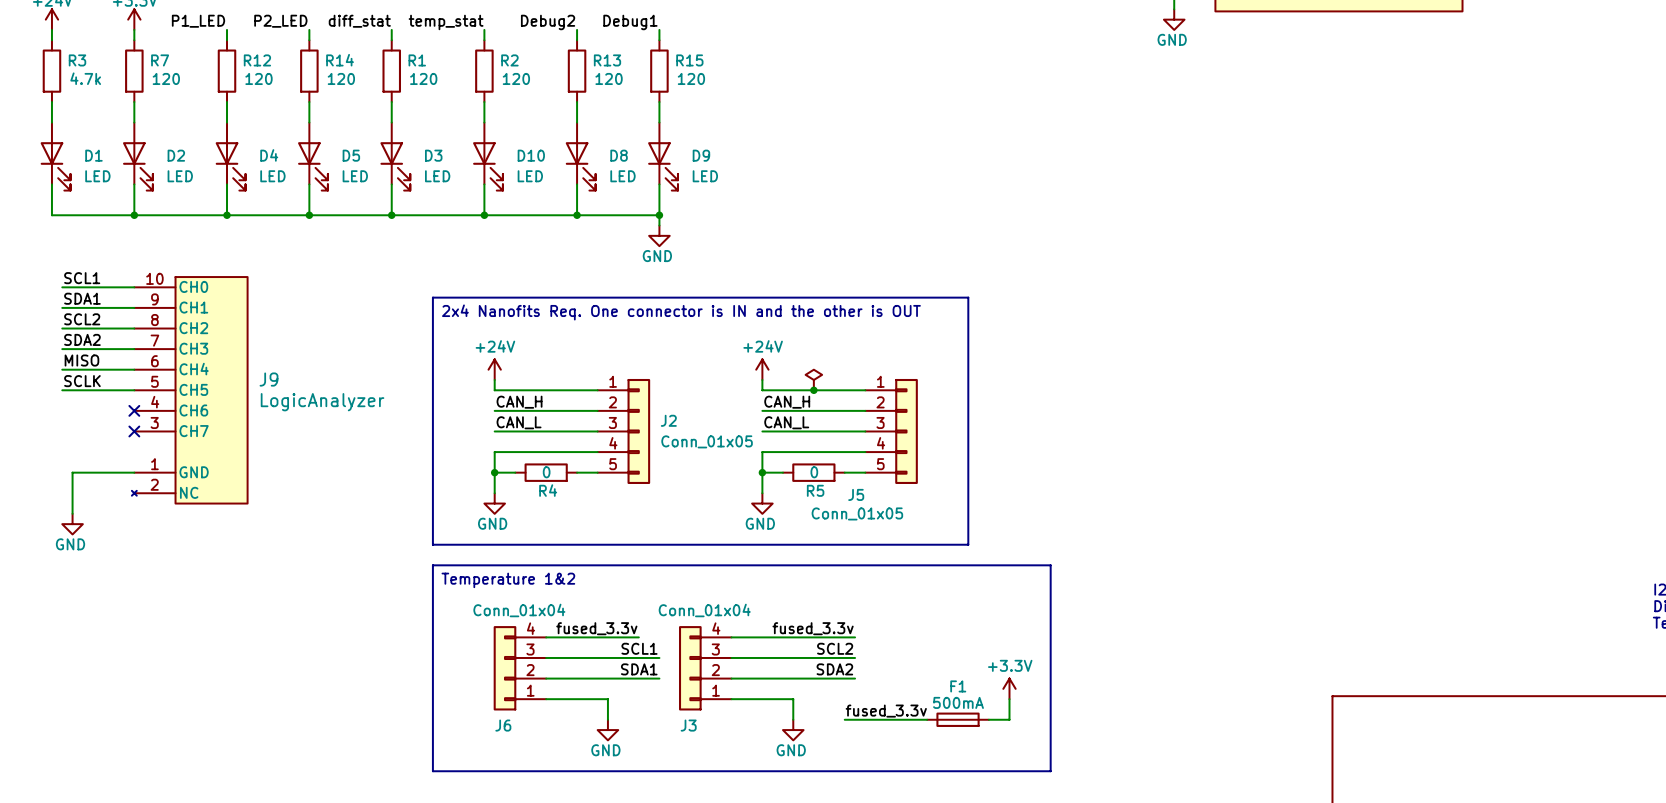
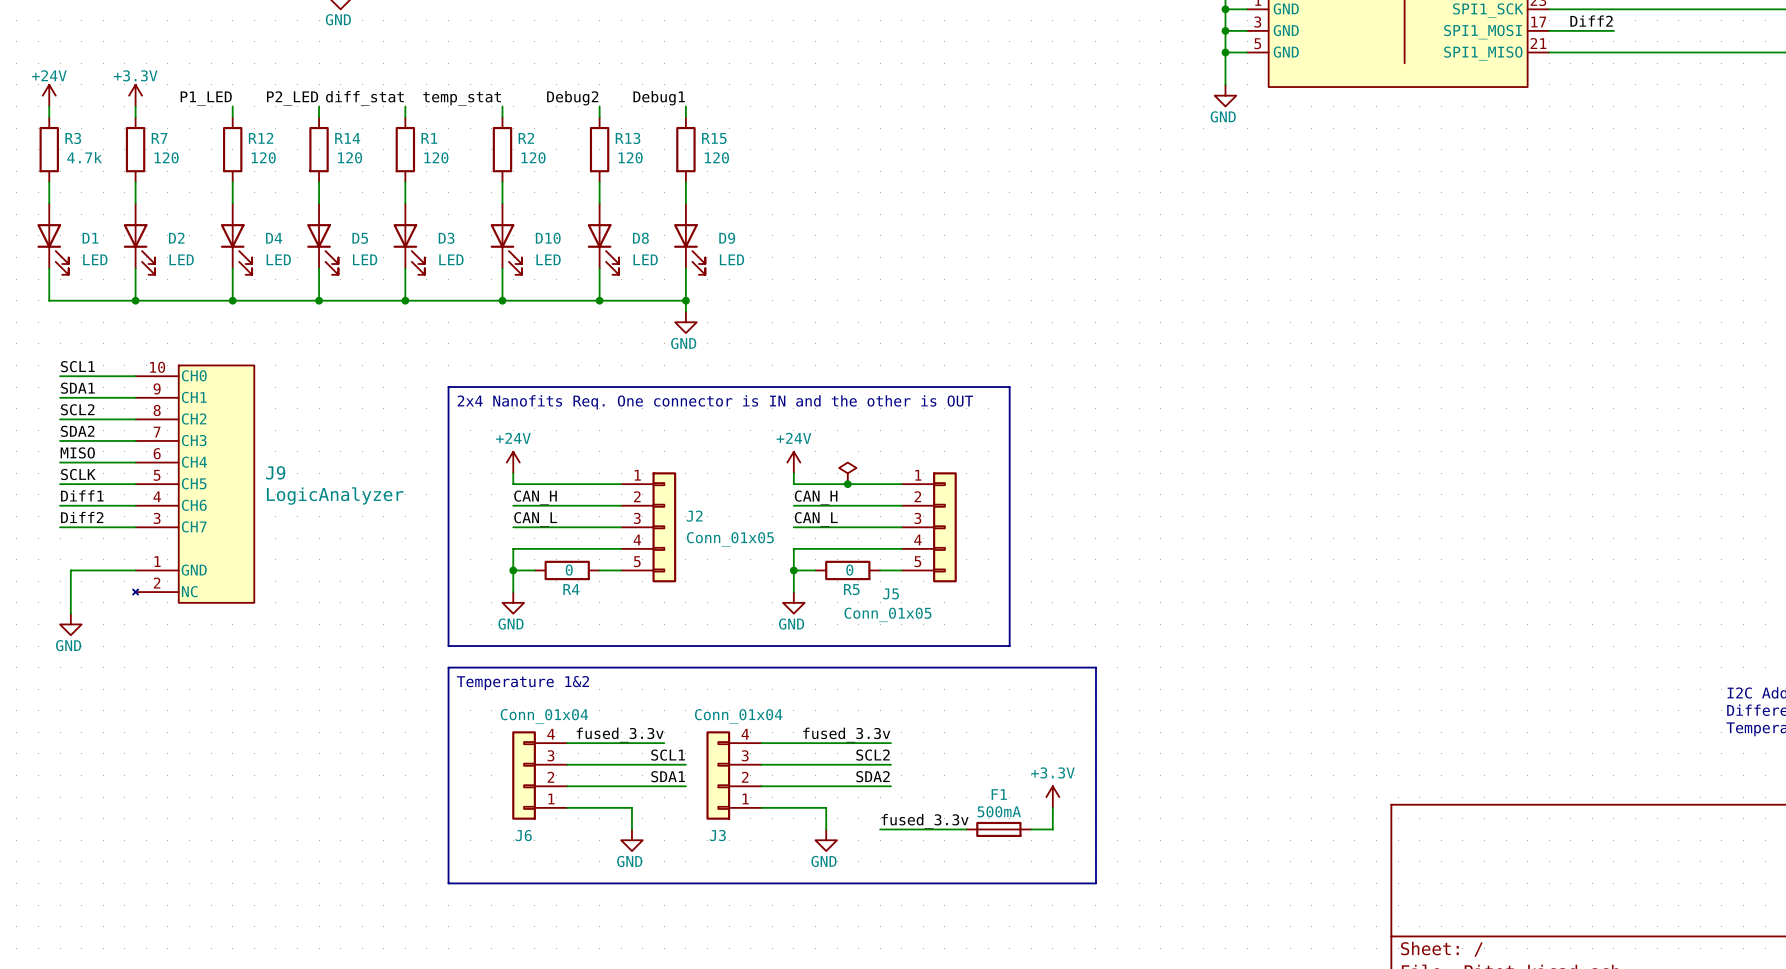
label: none -> Diff1 (82, 495)
wire: none -> (60, 505) (135, 505)
no-connect mark: (134, 410) -> none
label: none -> Diff2 (82, 517)
wire: none -> (60, 527) (135, 527)
no-connect mark: (134, 431) -> none

